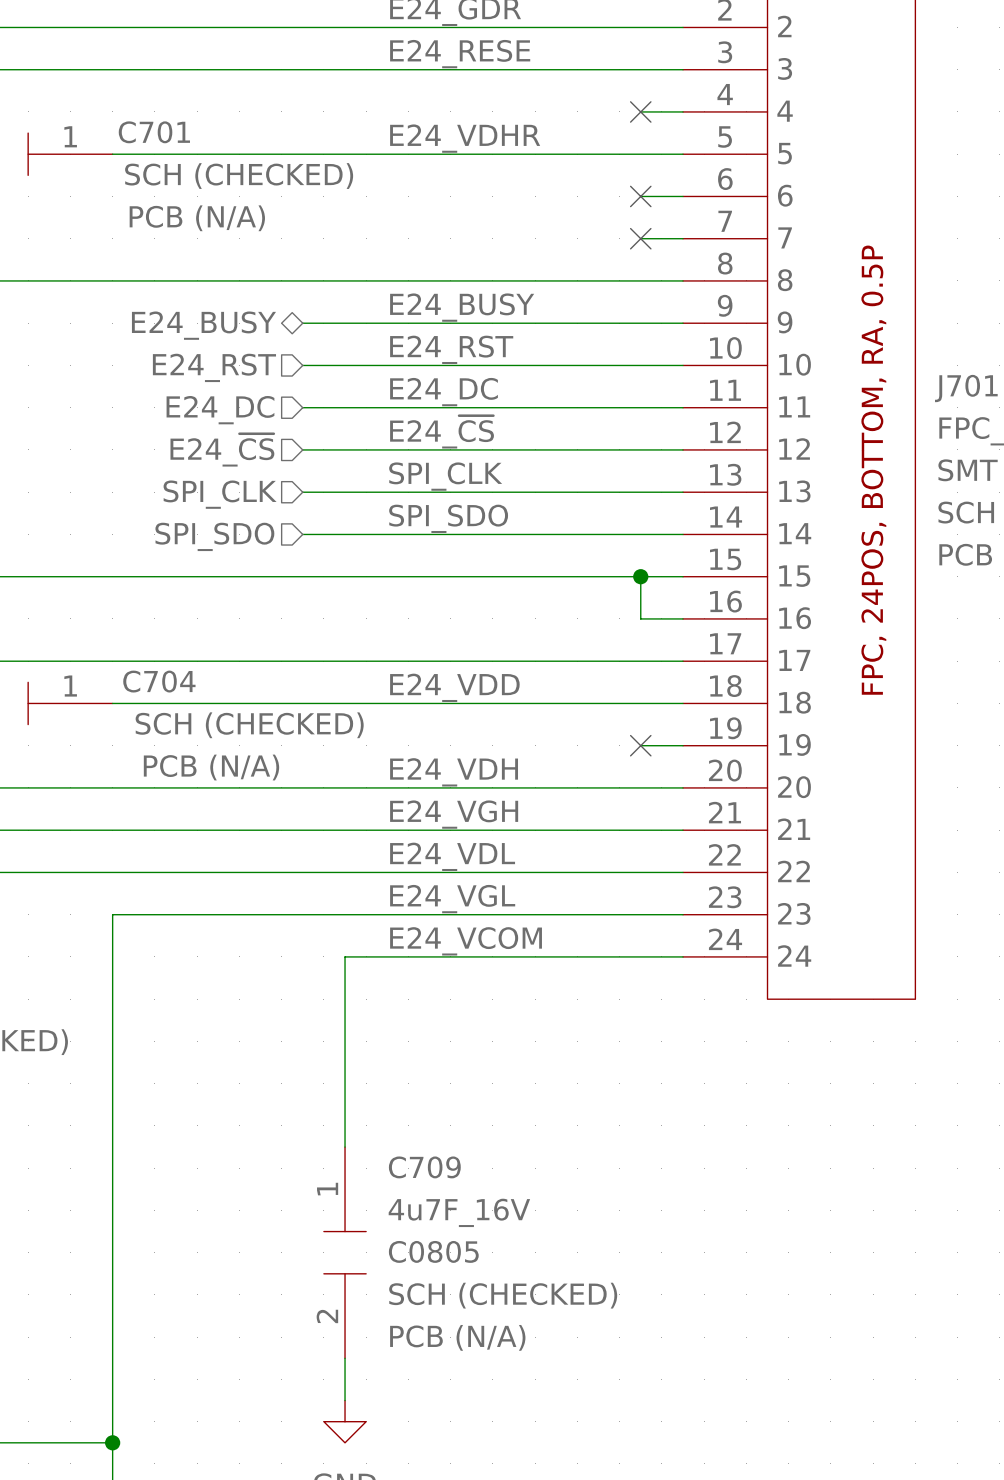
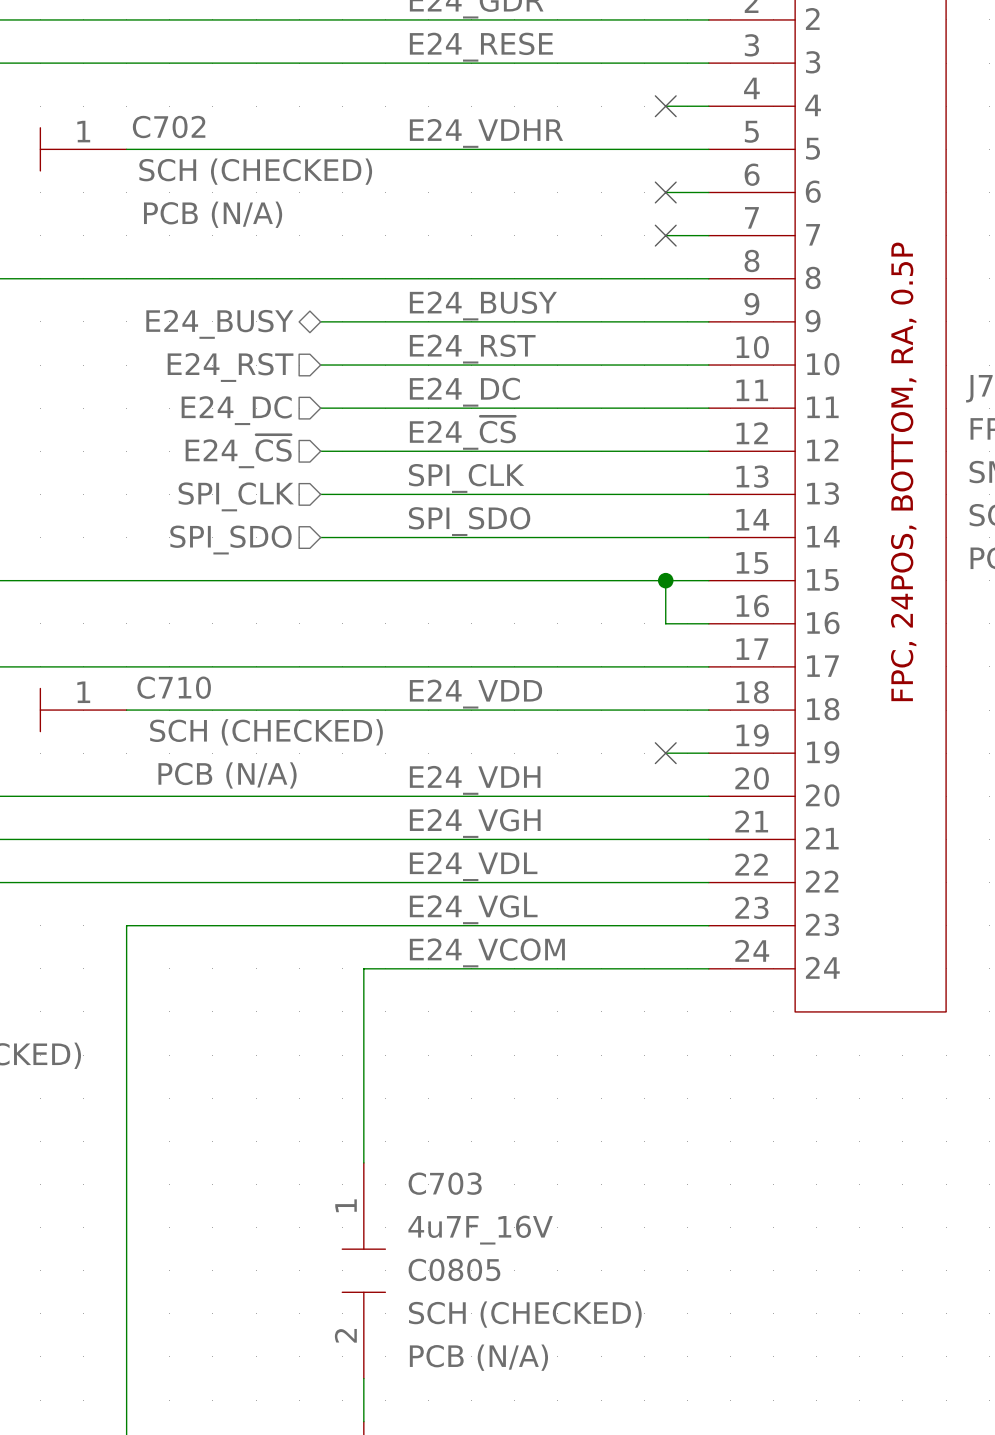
C701 name: C701 (154, 132) -> C702 (169, 127)
C704 name: C704 (159, 681) -> C710 (174, 687)
C709 name: C709 (424, 1167) -> C703 (445, 1183)

